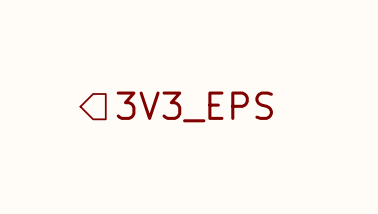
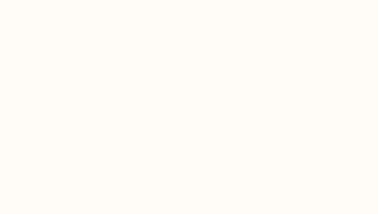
hierarchical label: 3V3_EPS (194, 106) -> none

